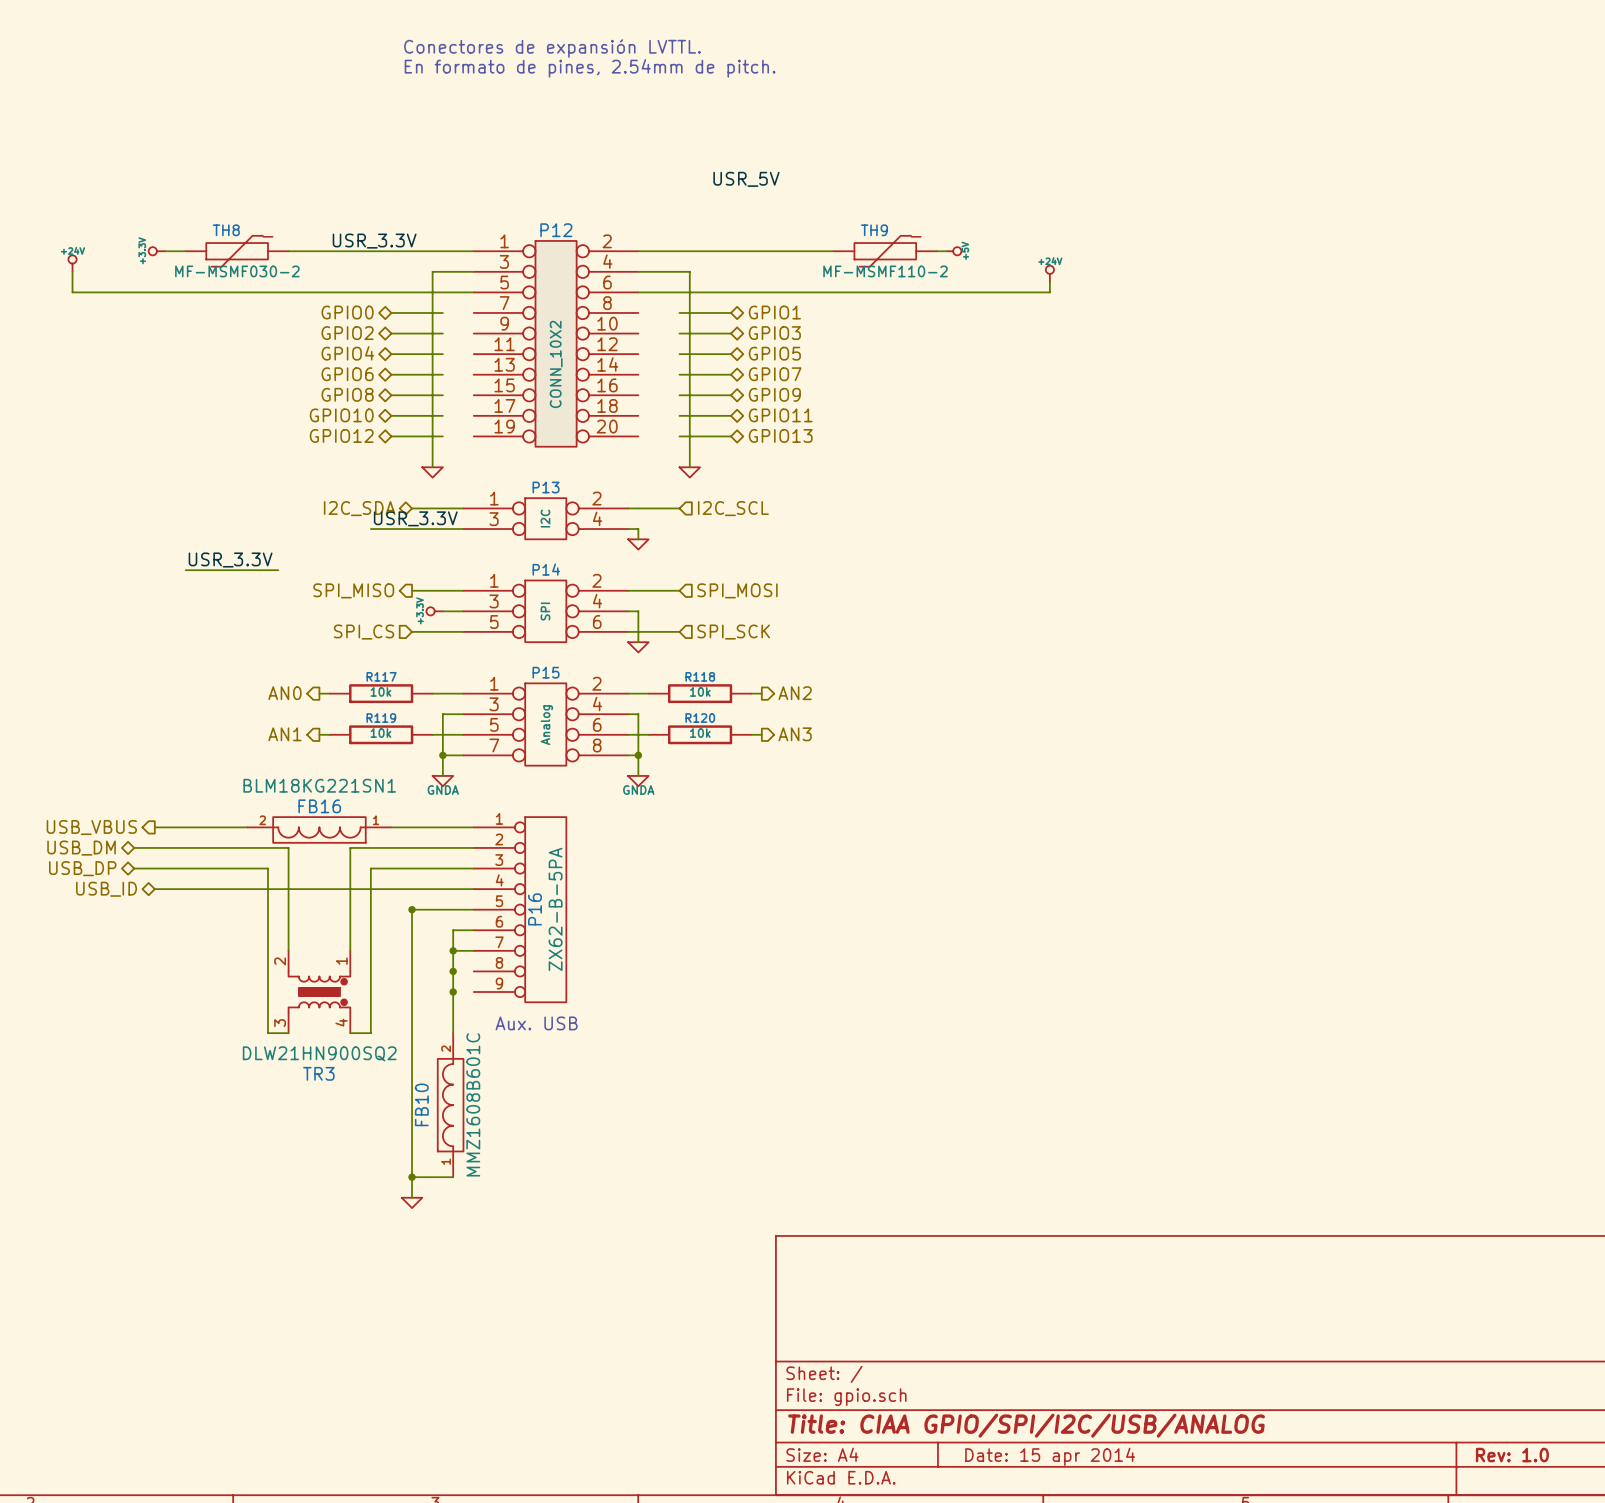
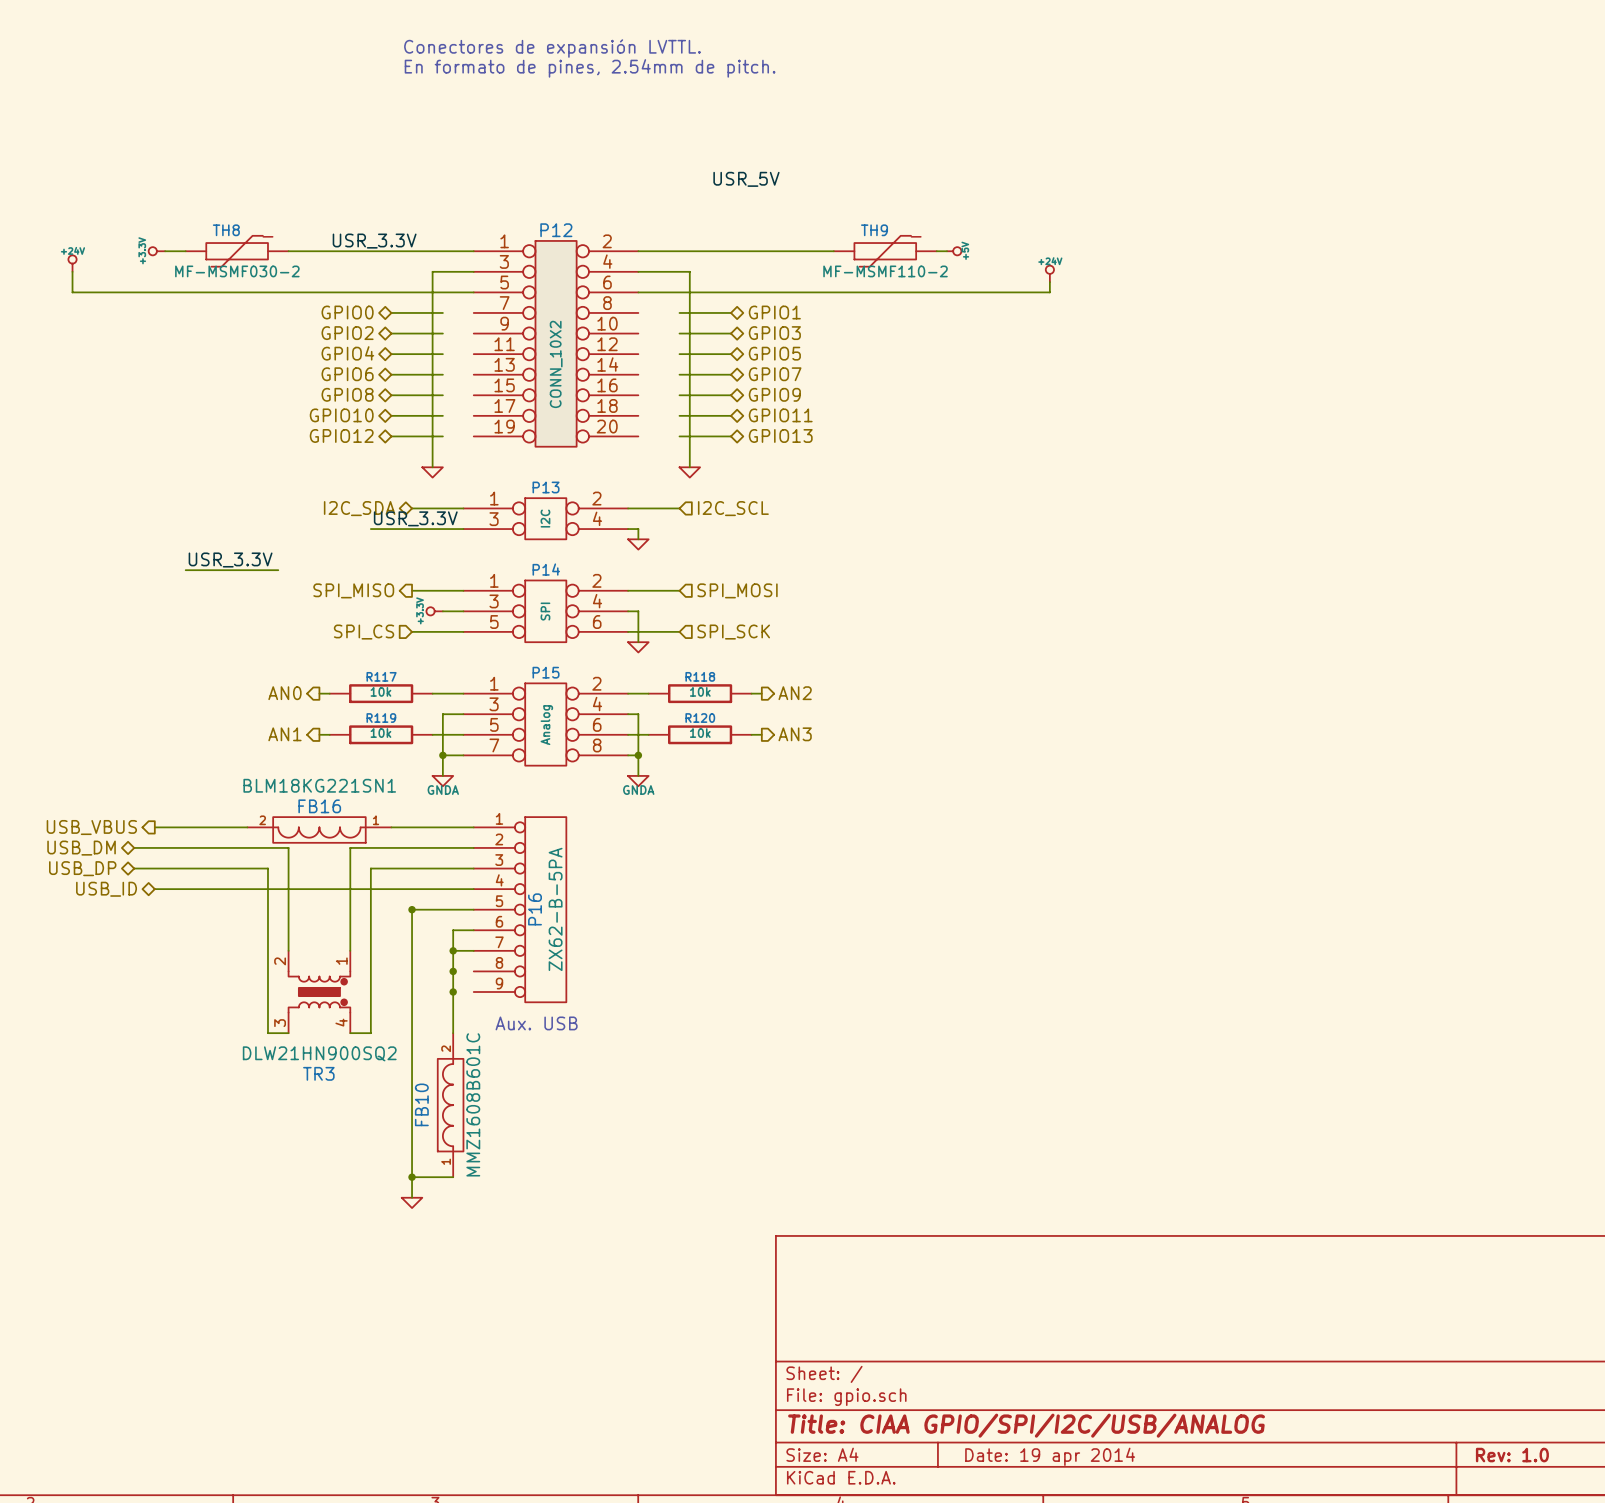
title block: Date: 15 apr 2014 (1050, 1456) -> Date: 19 apr 2014 (1050, 1456)

